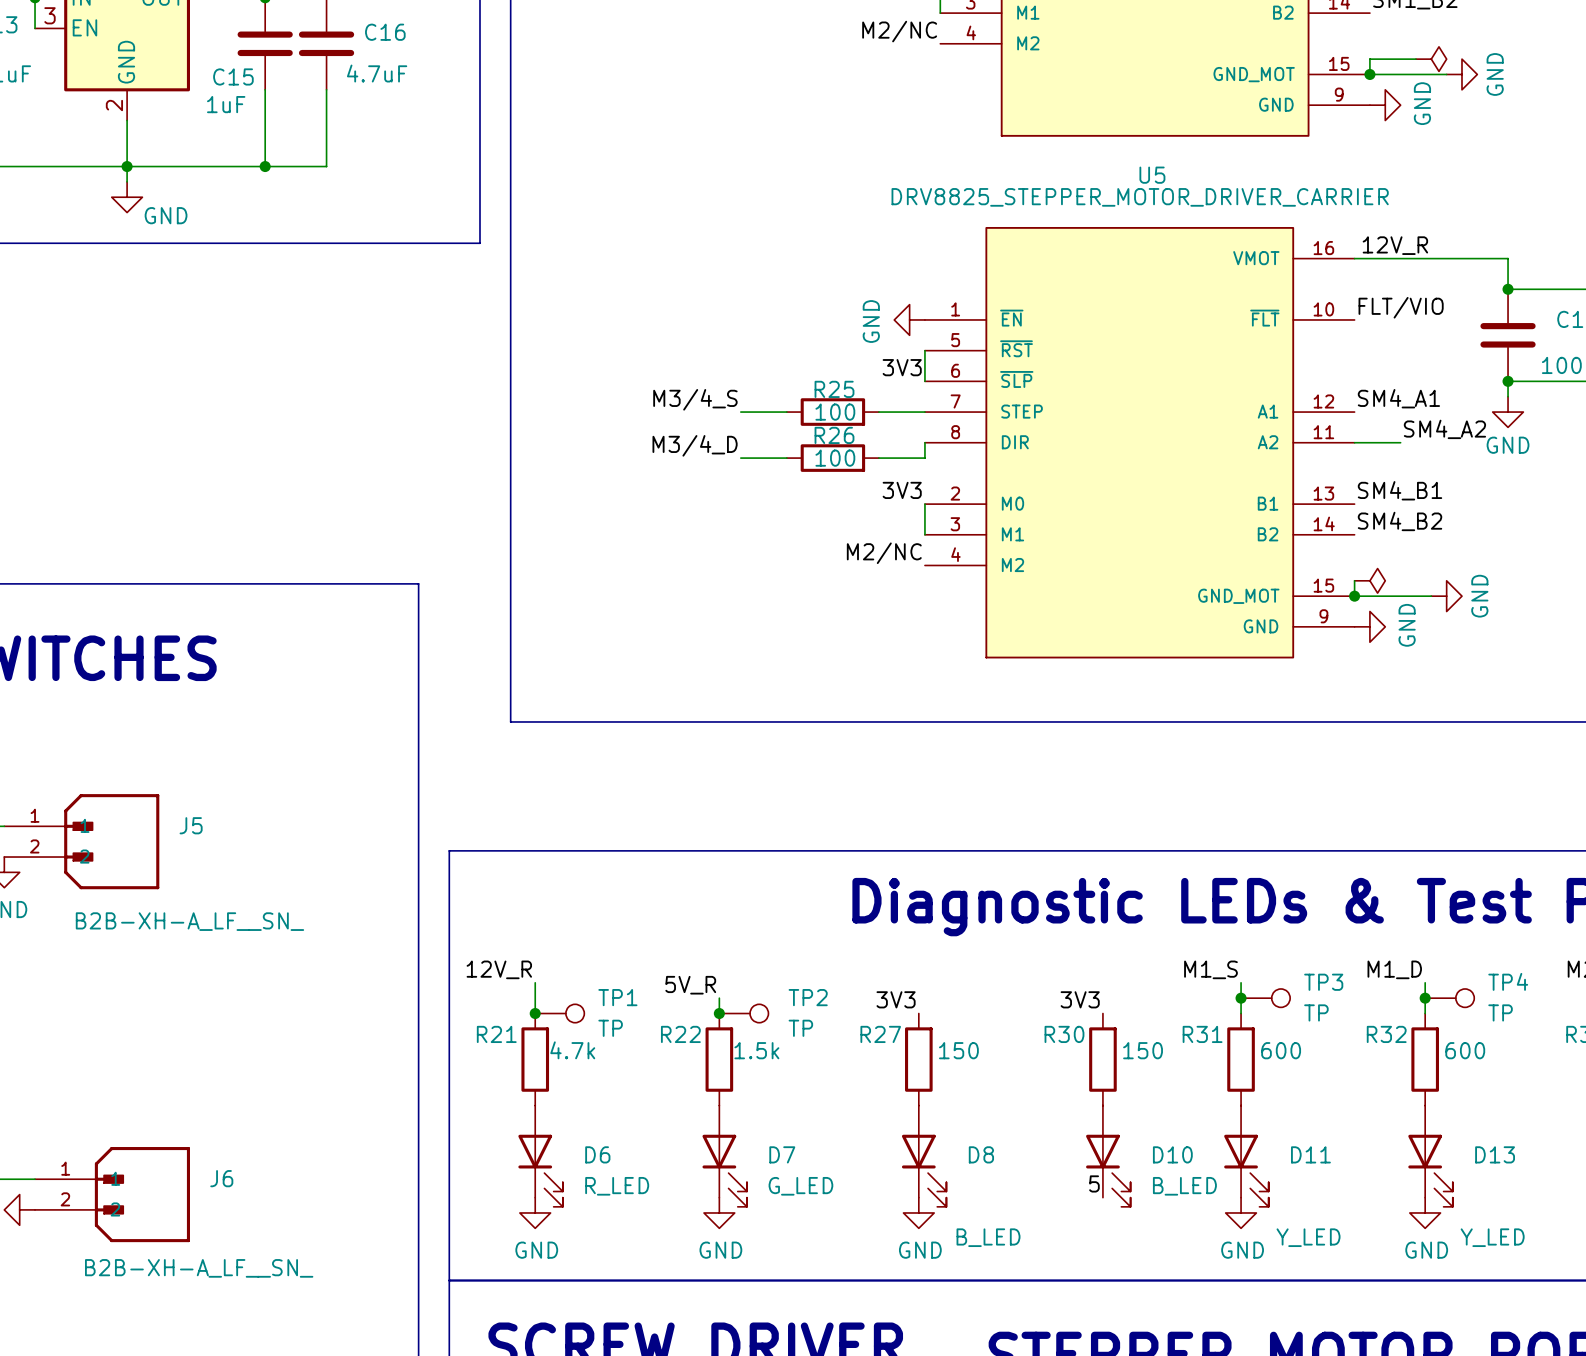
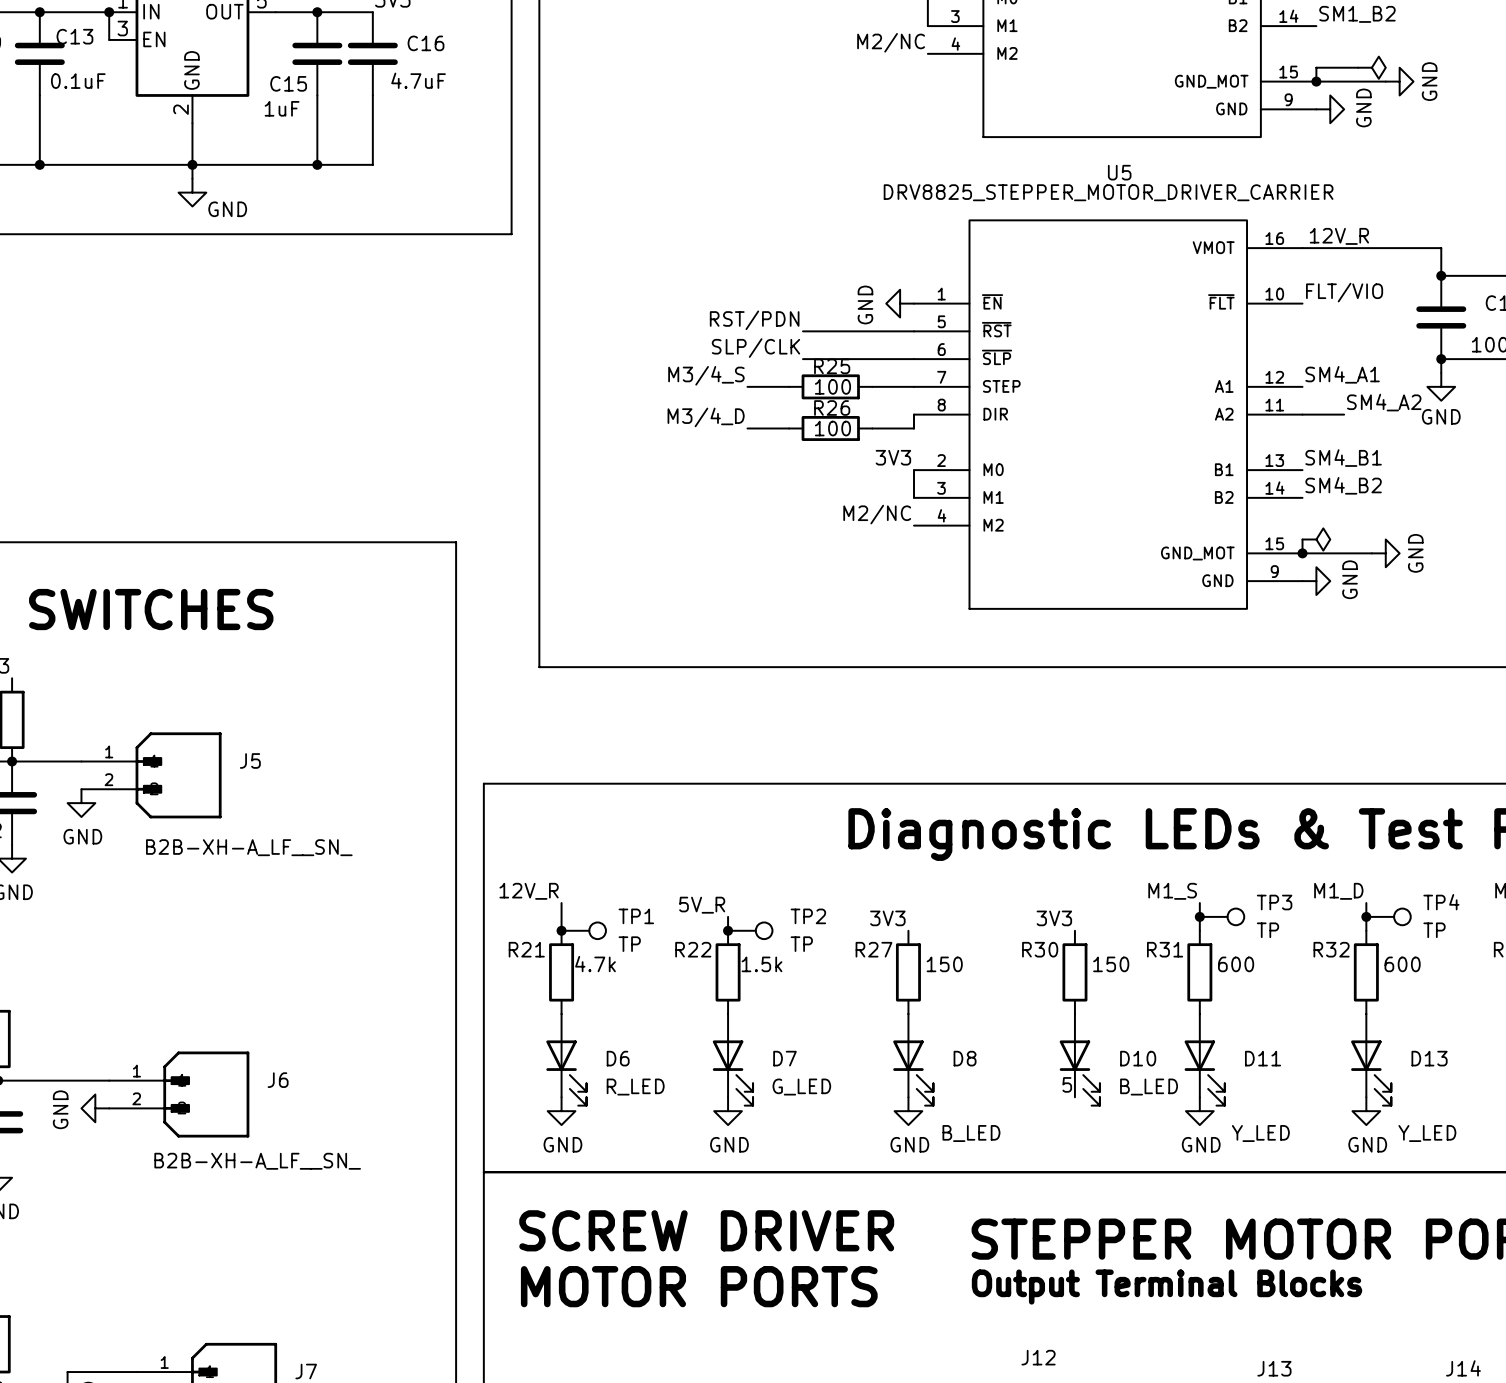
label: none -> RST/PDN (754, 320)
wire: (924, 350) (924, 381) -> (914, 331) (802, 331)
label: 3V3 (902, 367) -> none
label: none -> SLP/CLK (755, 348)
wire: none -> (802, 359) (914, 359)

